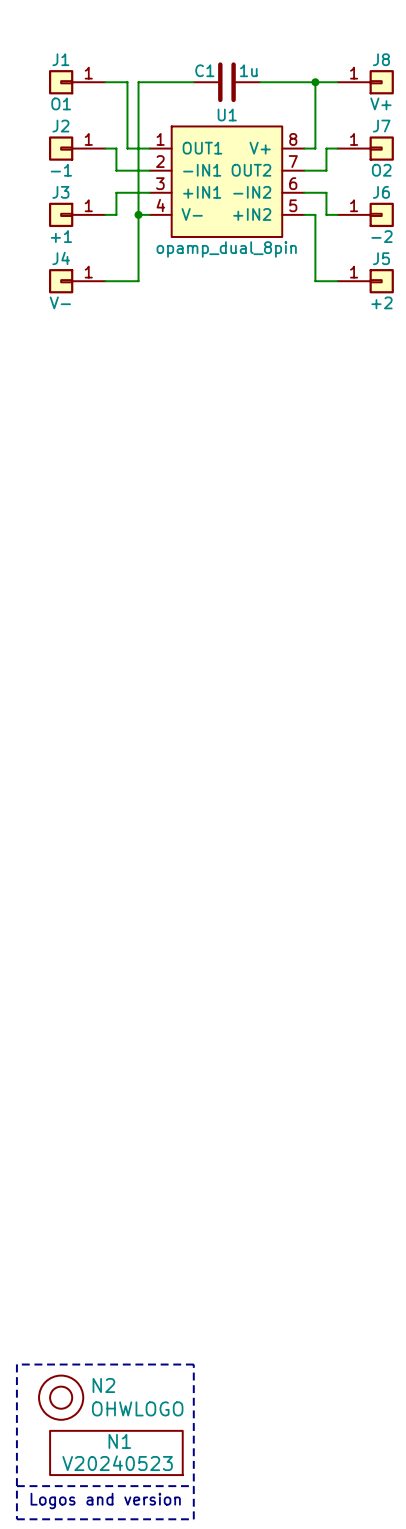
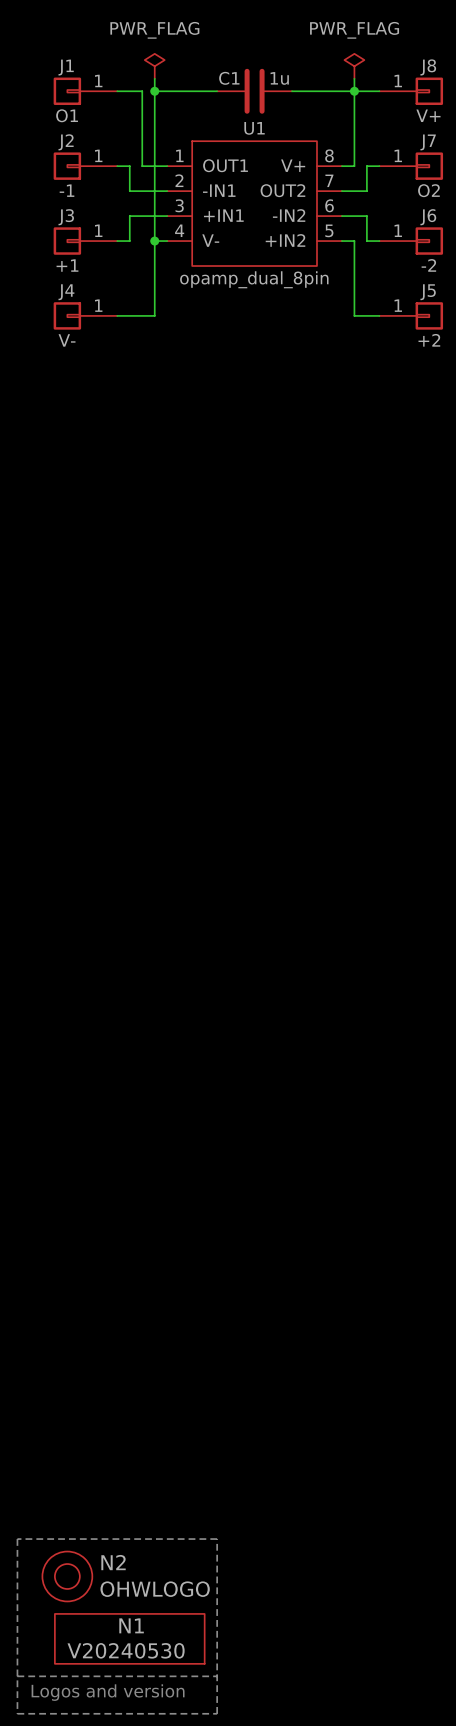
power symbol: none -> PWR_FLAG (154, 66)
power symbol: none -> PWR_FLAG (354, 66)
wire: none -> (154, 78) (154, 91)
wire: none -> (354, 78) (354, 91)
junction: none -> (154, 91)
N1 value: V20240523 (117, 1463) -> V20240530 (126, 1650)

